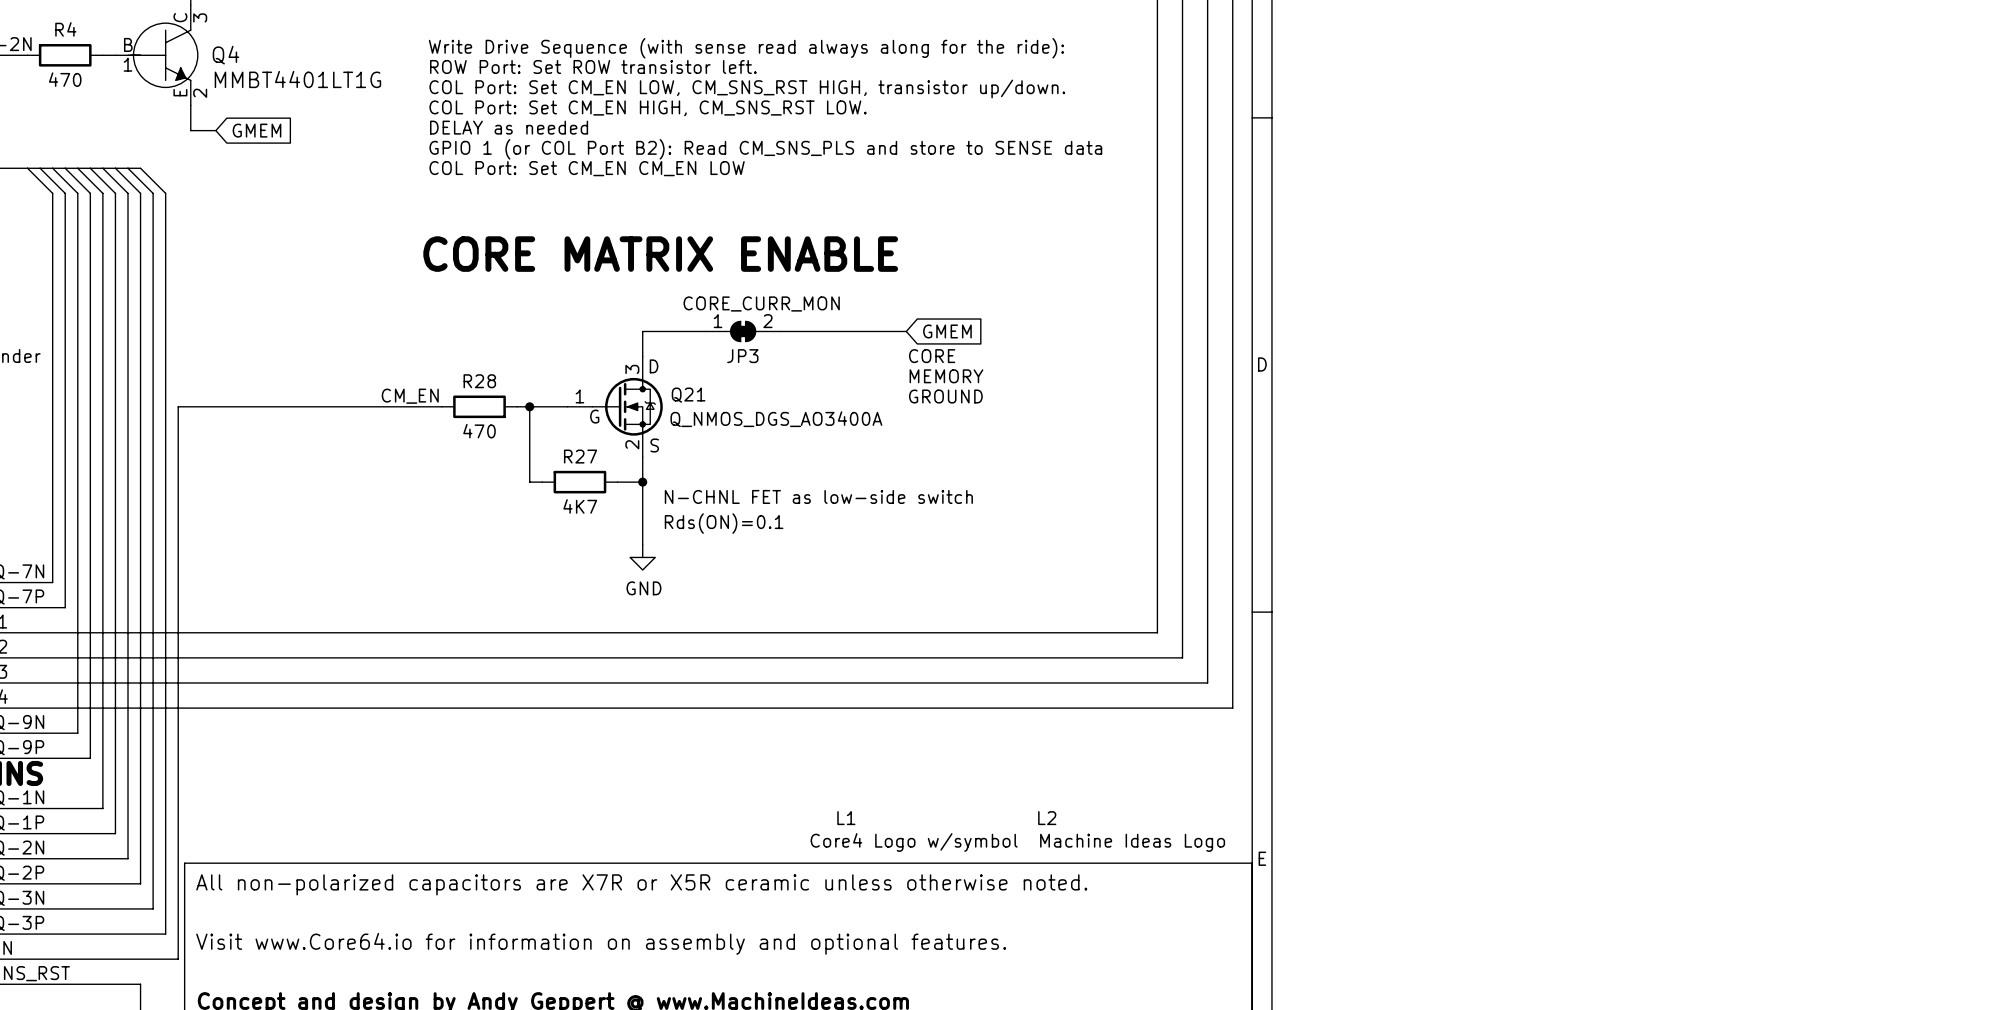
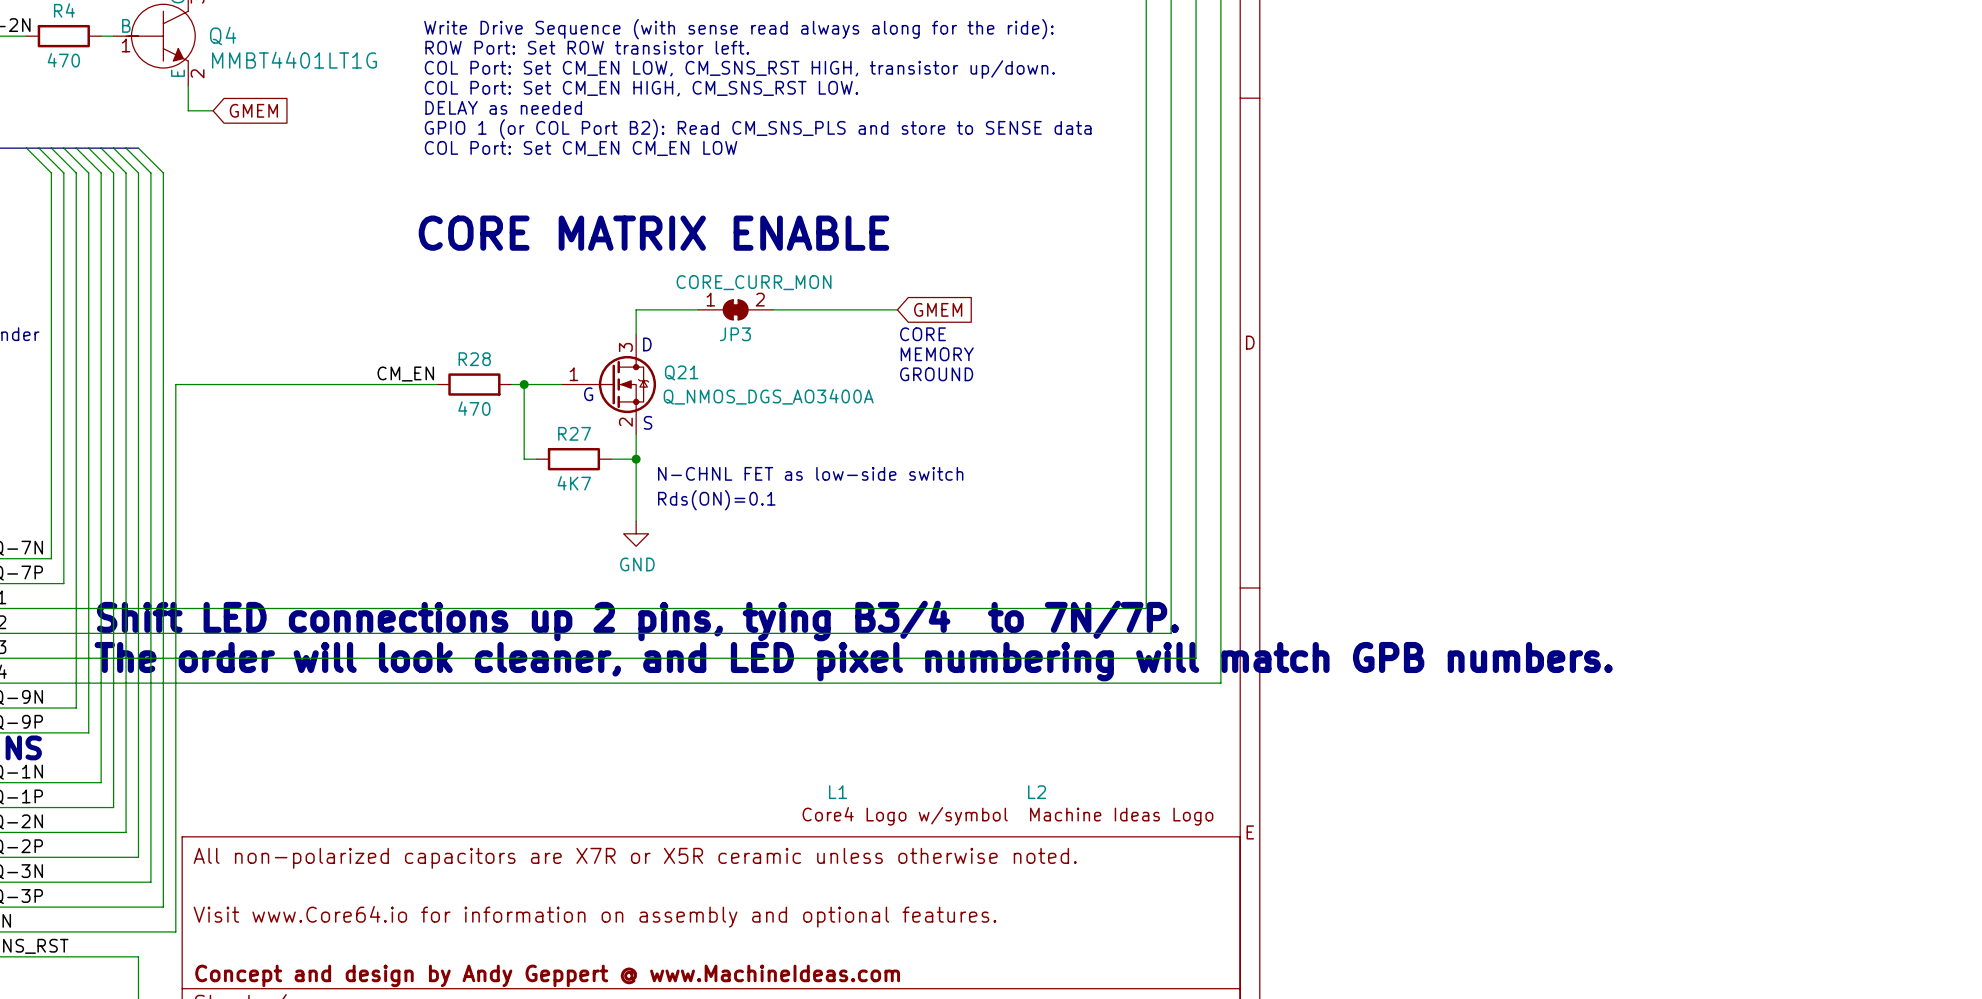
text: none -> Shift LED connections up 2 pins, tying B3/4 to 7N/7P. (637, 620)
text: none -> The order will look cleaner, and LED pixel numbering will match GPB numbers. (853, 661)

